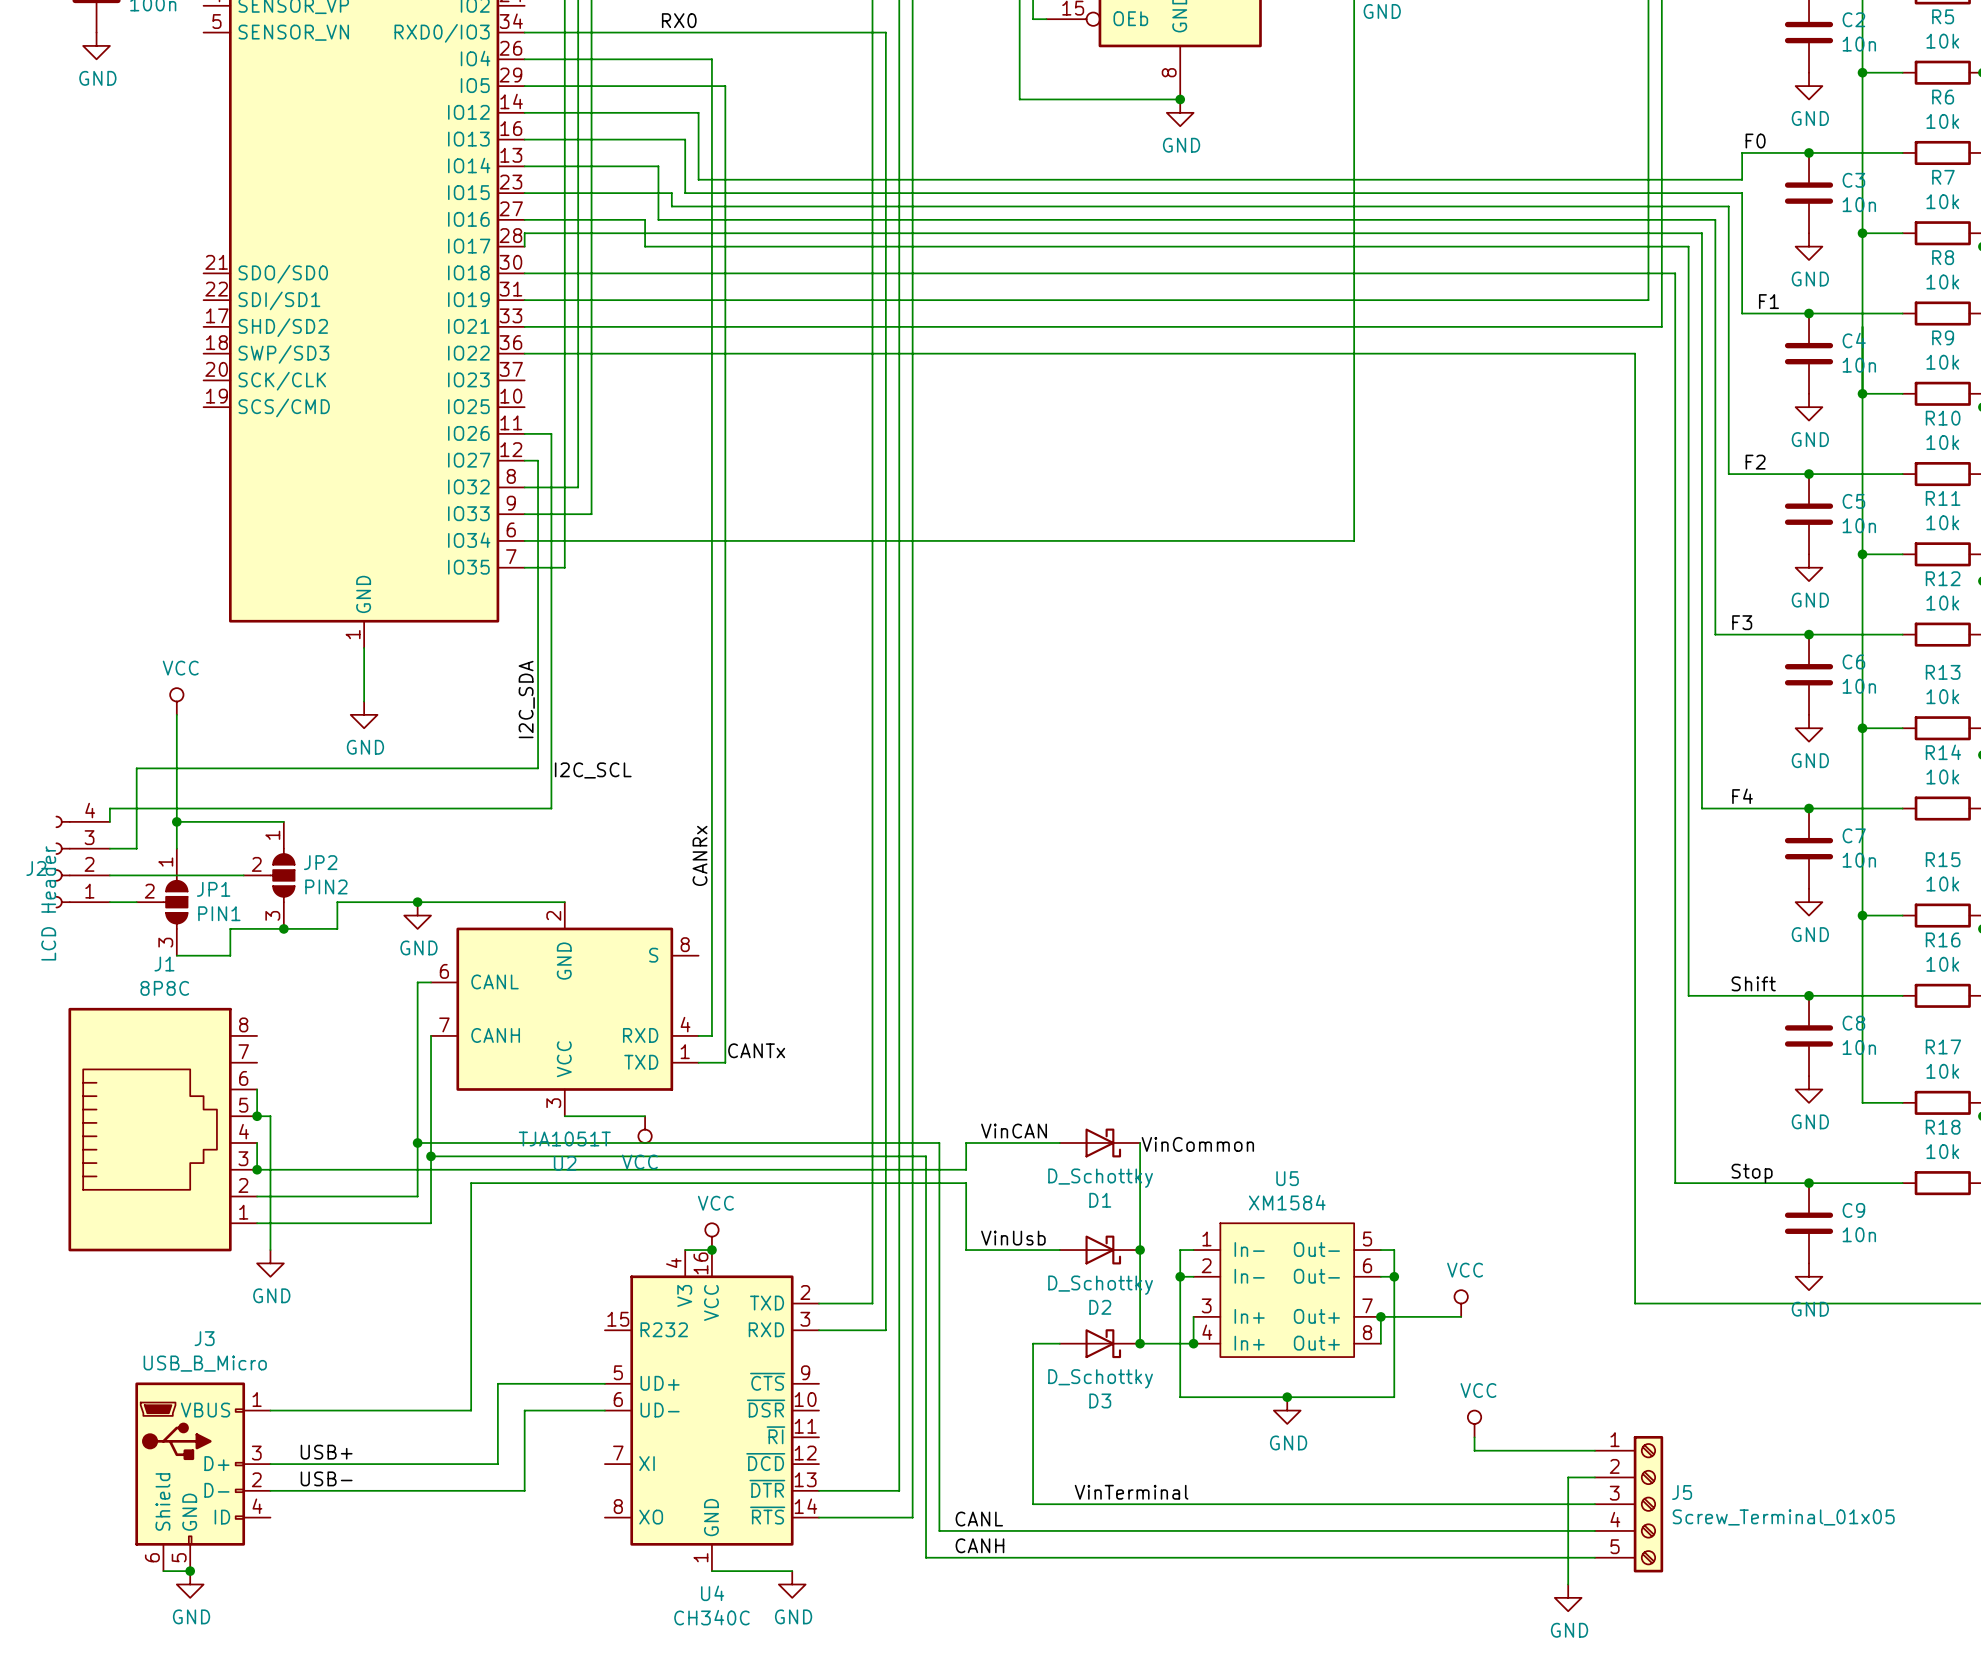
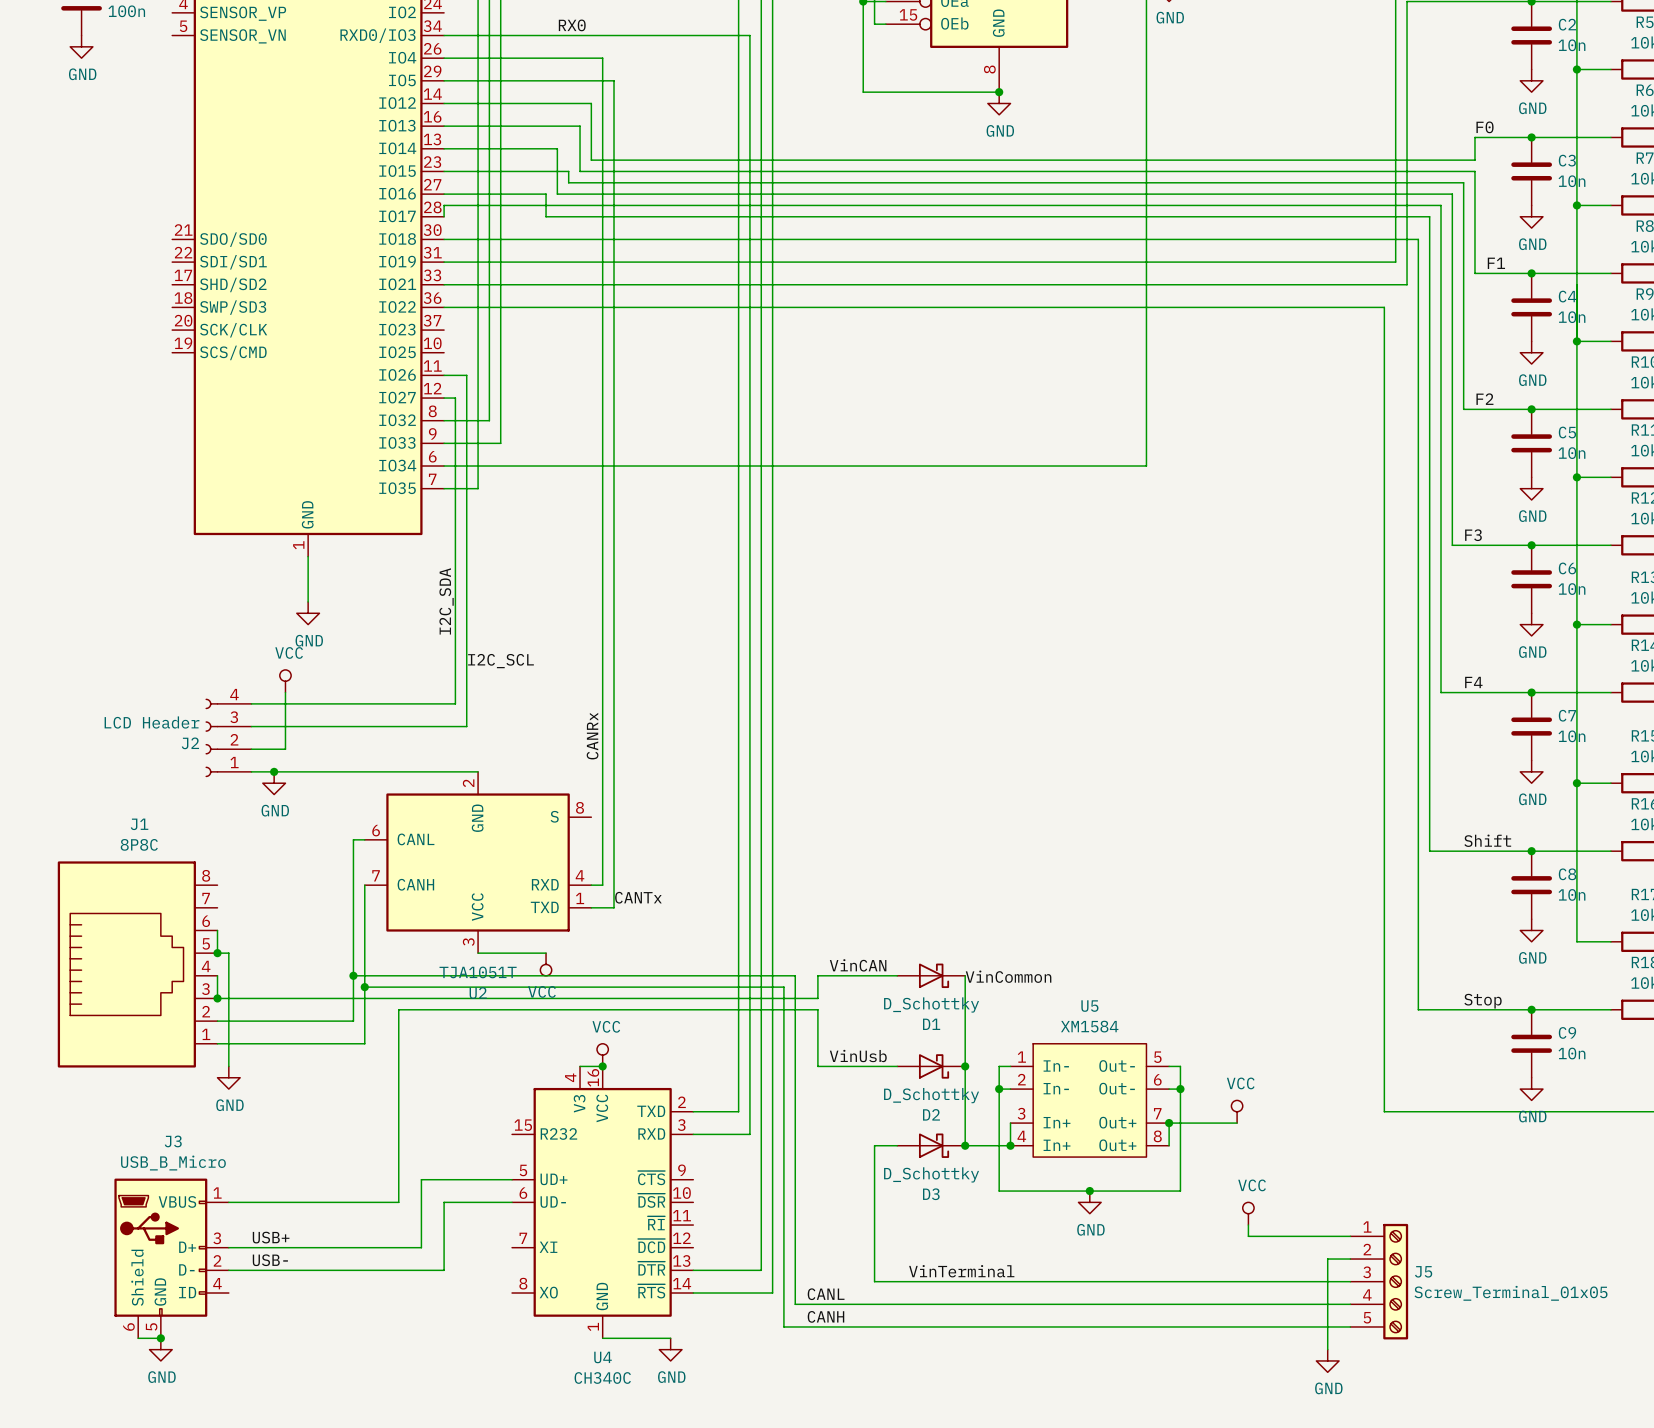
power symbol position: VCC (176, 701) -> VCC (285, 681)
wire: (176, 714) (176, 848) -> none
wire: (538, 768) (136, 768) (136, 848) (109, 848) -> (455, 658) (455, 703) (251, 703)
wire: none -> (285, 692) (285, 749) (251, 749)
wire: (551, 808) (109, 808) (109, 821) -> (466, 692) (466, 726) (251, 726)
wire: (176, 821) (283, 821) -> none
junction: (176, 821) -> none
J2 position: (82, 862) -> (228, 737)
wire: (109, 875) (243, 875) -> none
JP2: PIN2 (269, 875) -> none
wire: (109, 902) (136, 902) -> none
JP1: PIN1 (162, 902) -> none
junction: none -> (274, 771)
wire: (337, 902) (337, 928) (230, 928) (230, 955) (176, 955) -> (285, 771) (251, 771)
junction: (417, 902) -> none
J2 value rotation: 0° (48, 903) -> 90° clockwise (152, 722)
power symbol position: GND (417, 915) -> GND (274, 783)
junction: (283, 928) -> none

